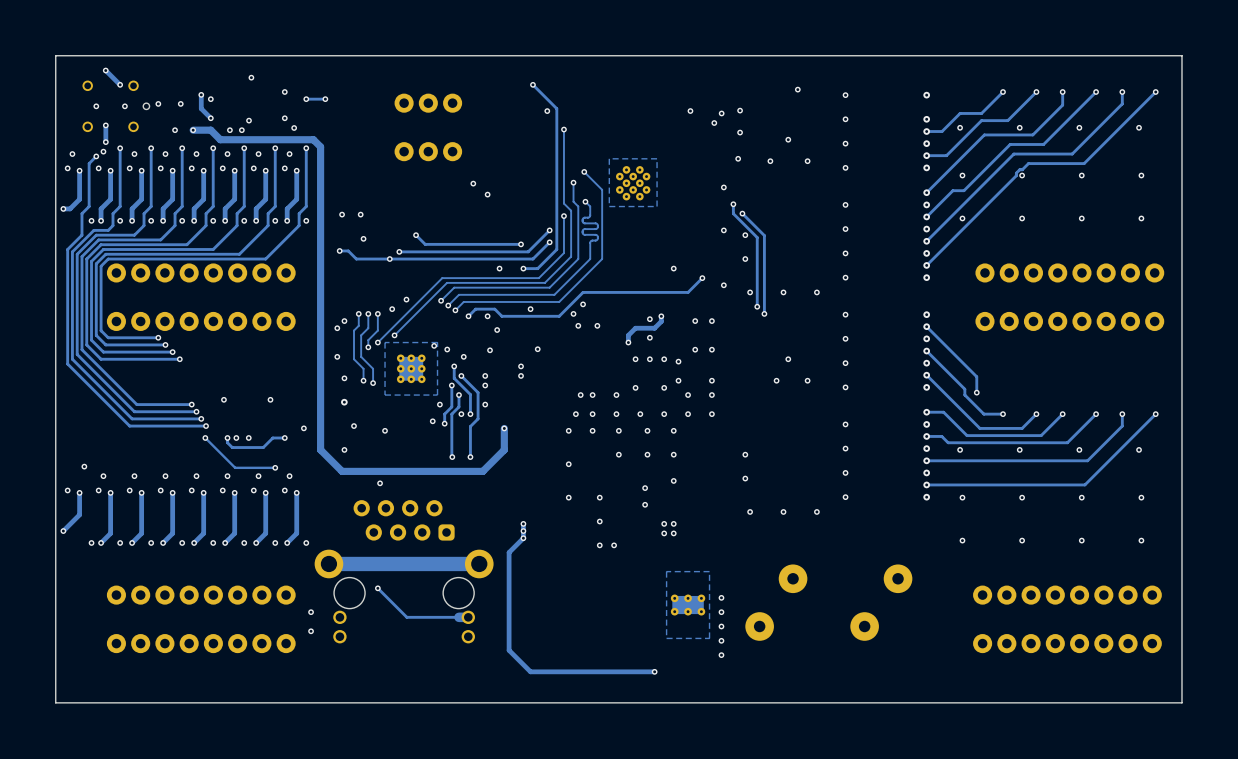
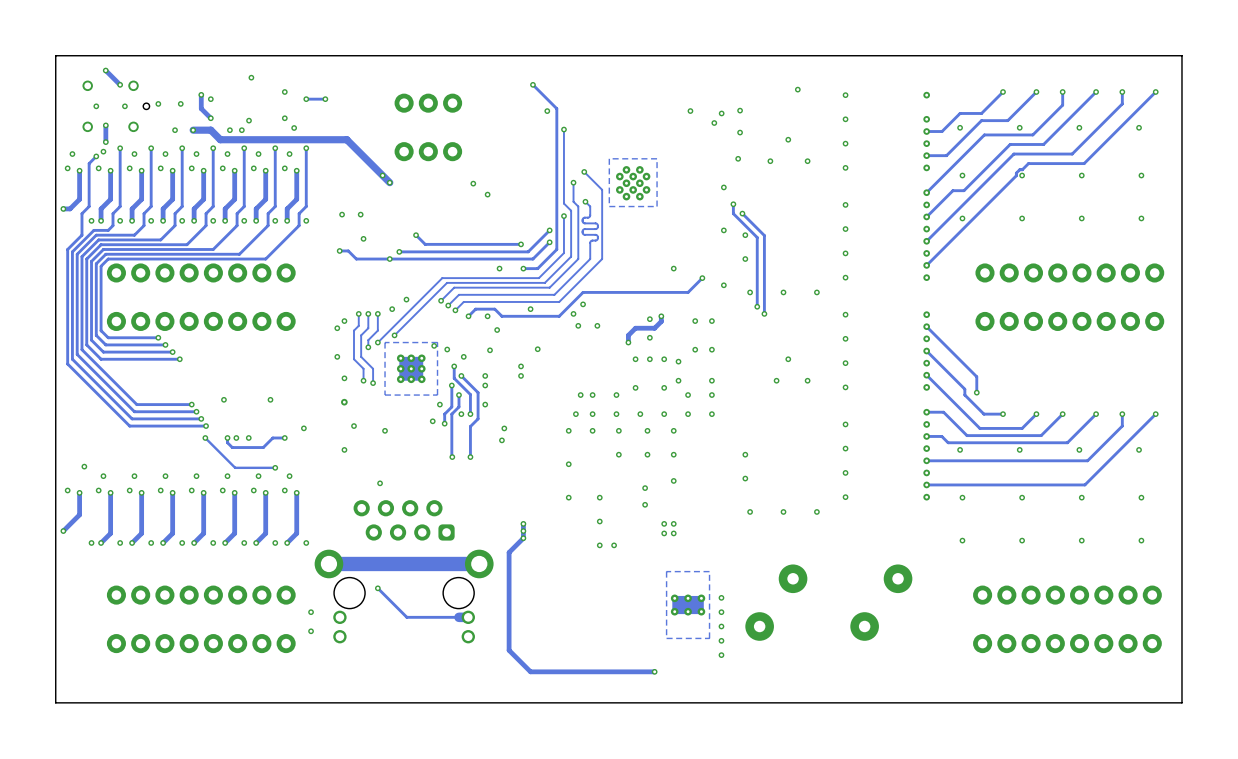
track: (313, 139) (320, 146) (320, 449) (342, 471) (482, 471) (504, 449) (504, 428) -> (313, 139) (346, 139) (389, 182)
via: none -> (382, 175)
via: none -> (389, 182)
via: none -> (501, 440)

